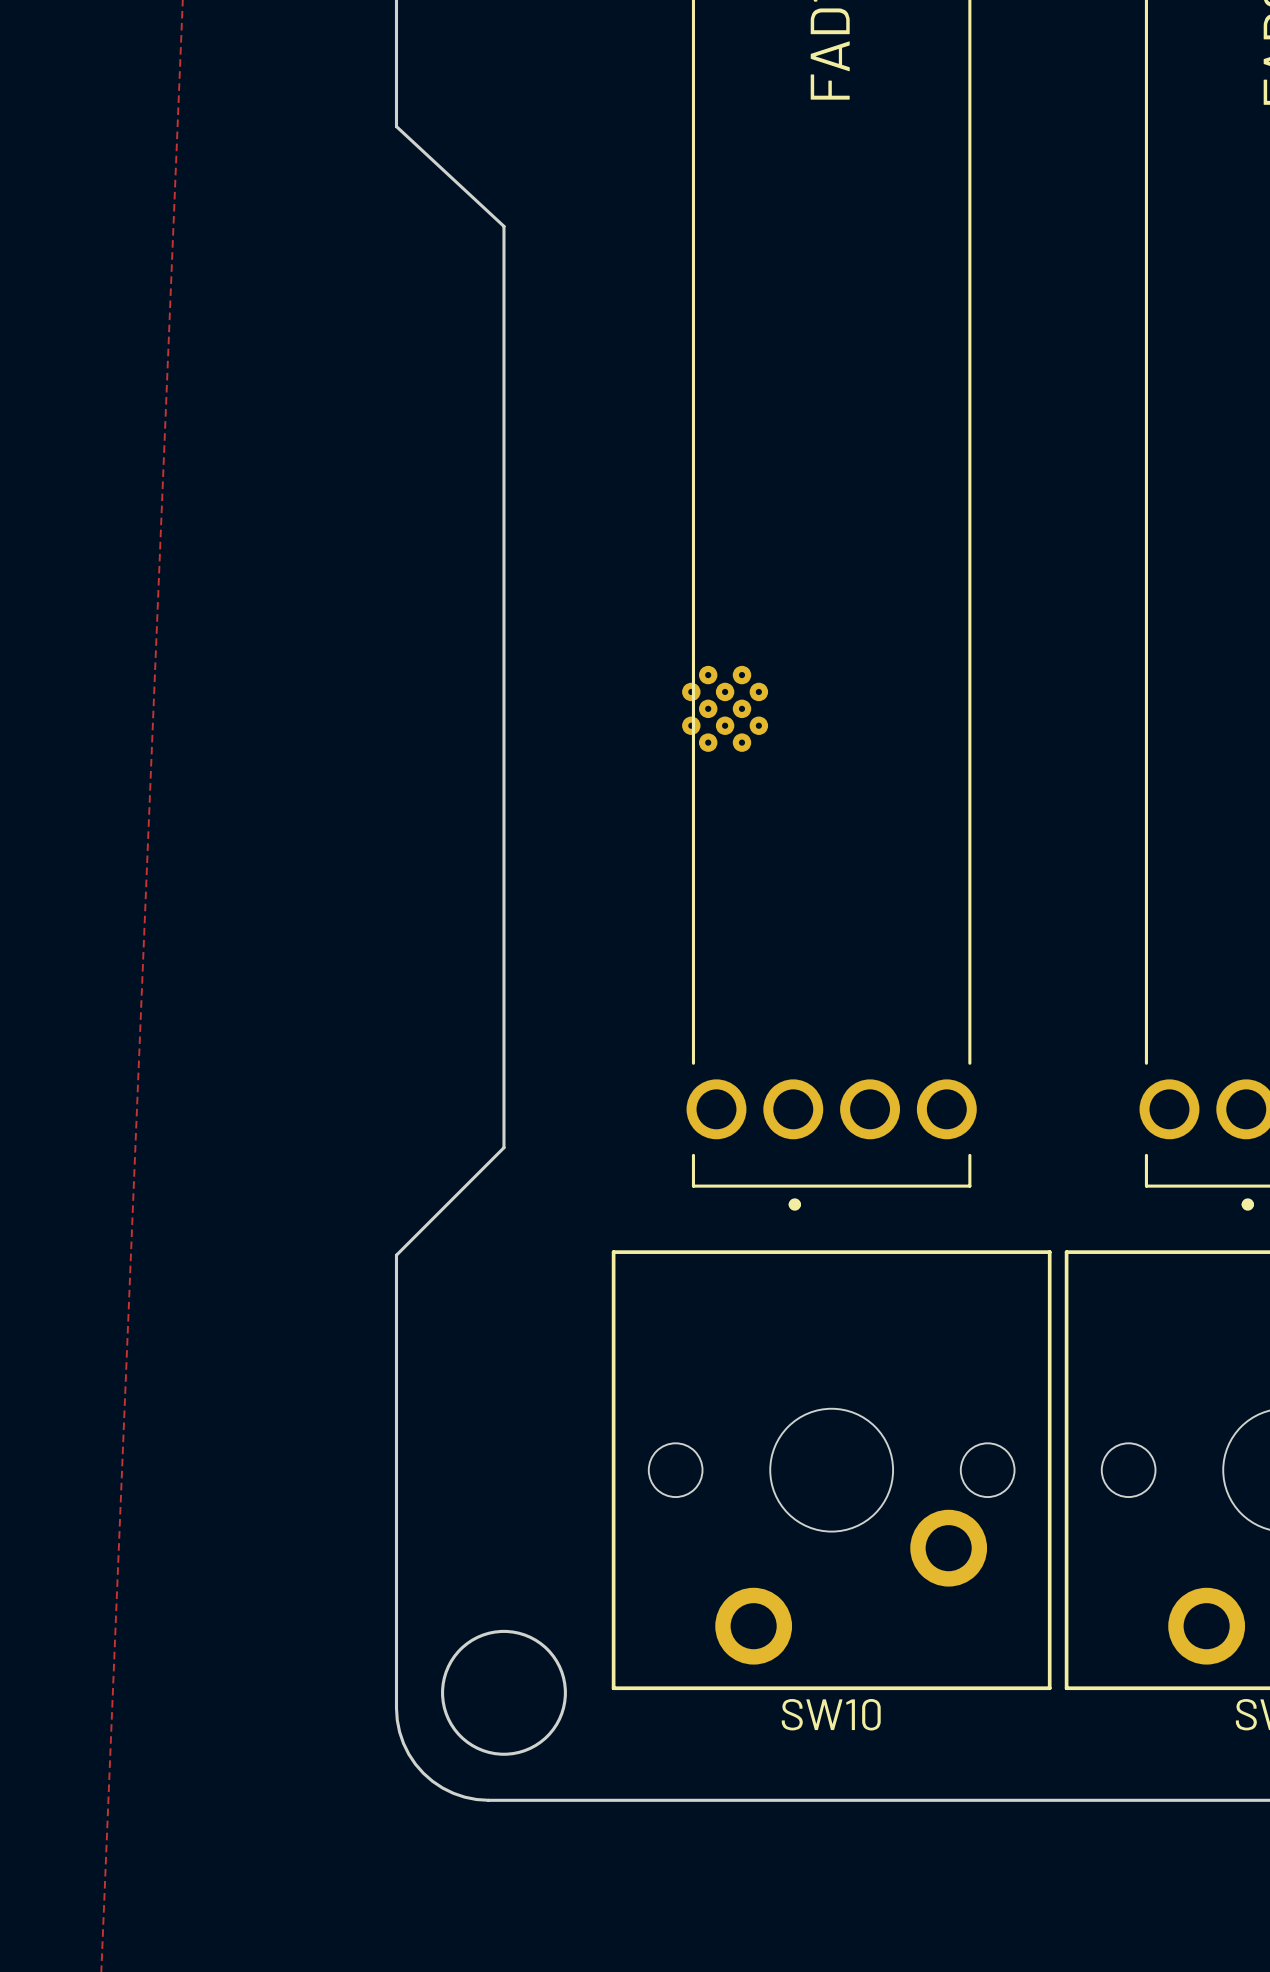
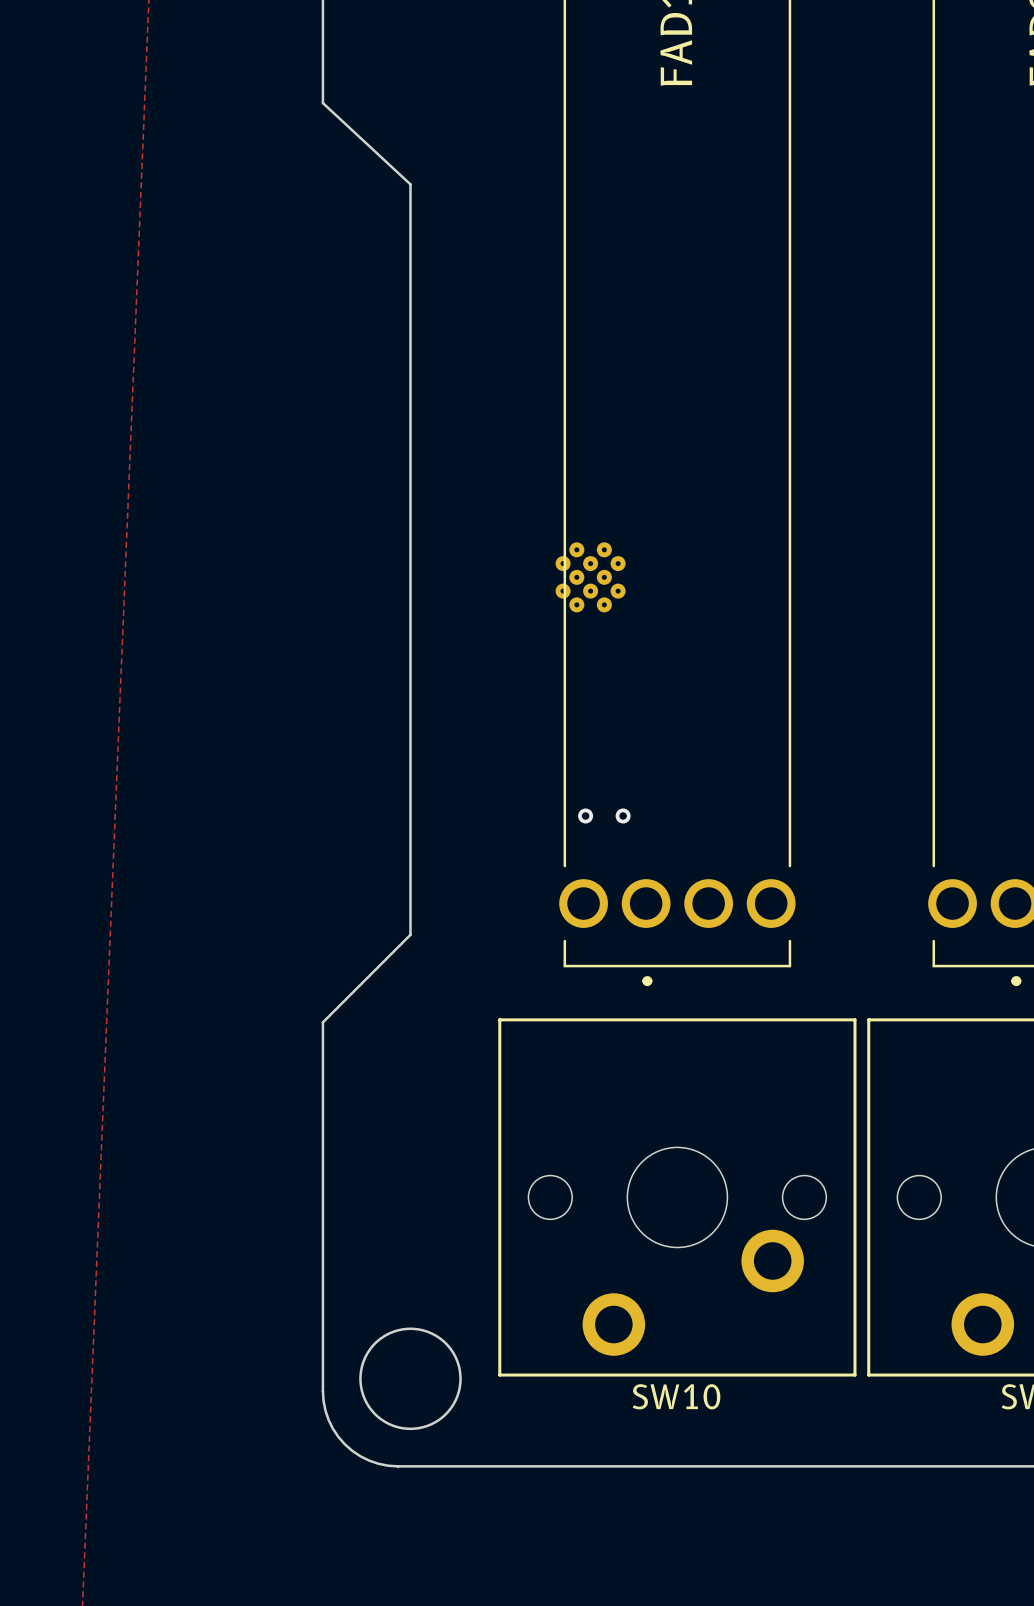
via: none -> (585, 815)
via: none -> (623, 815)

